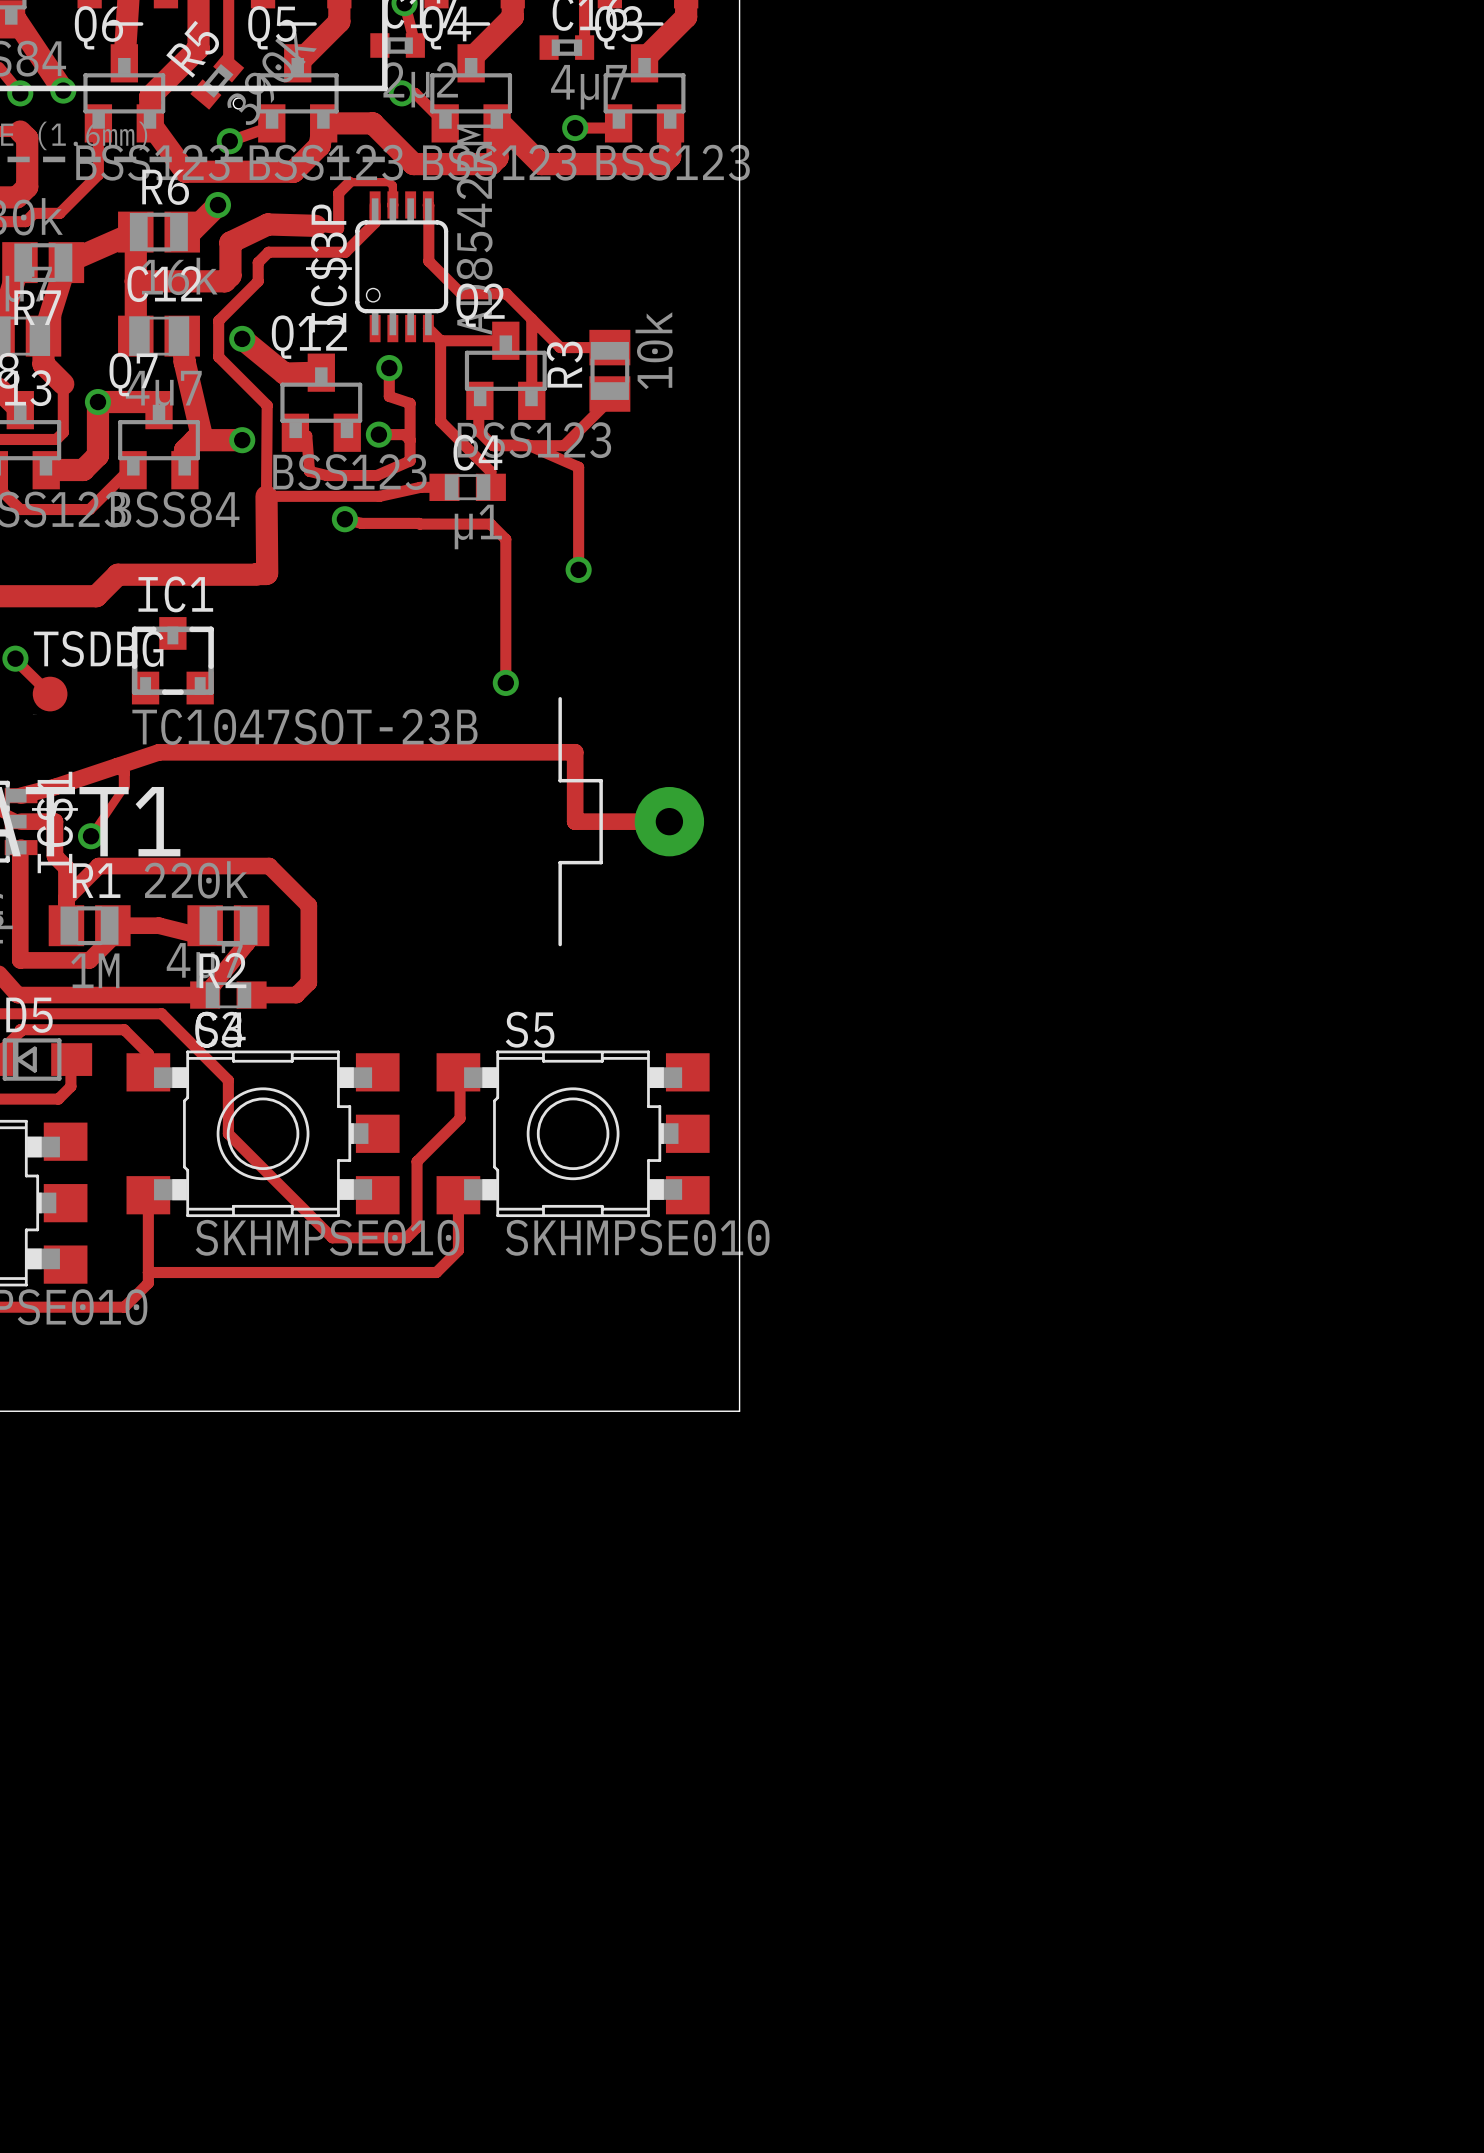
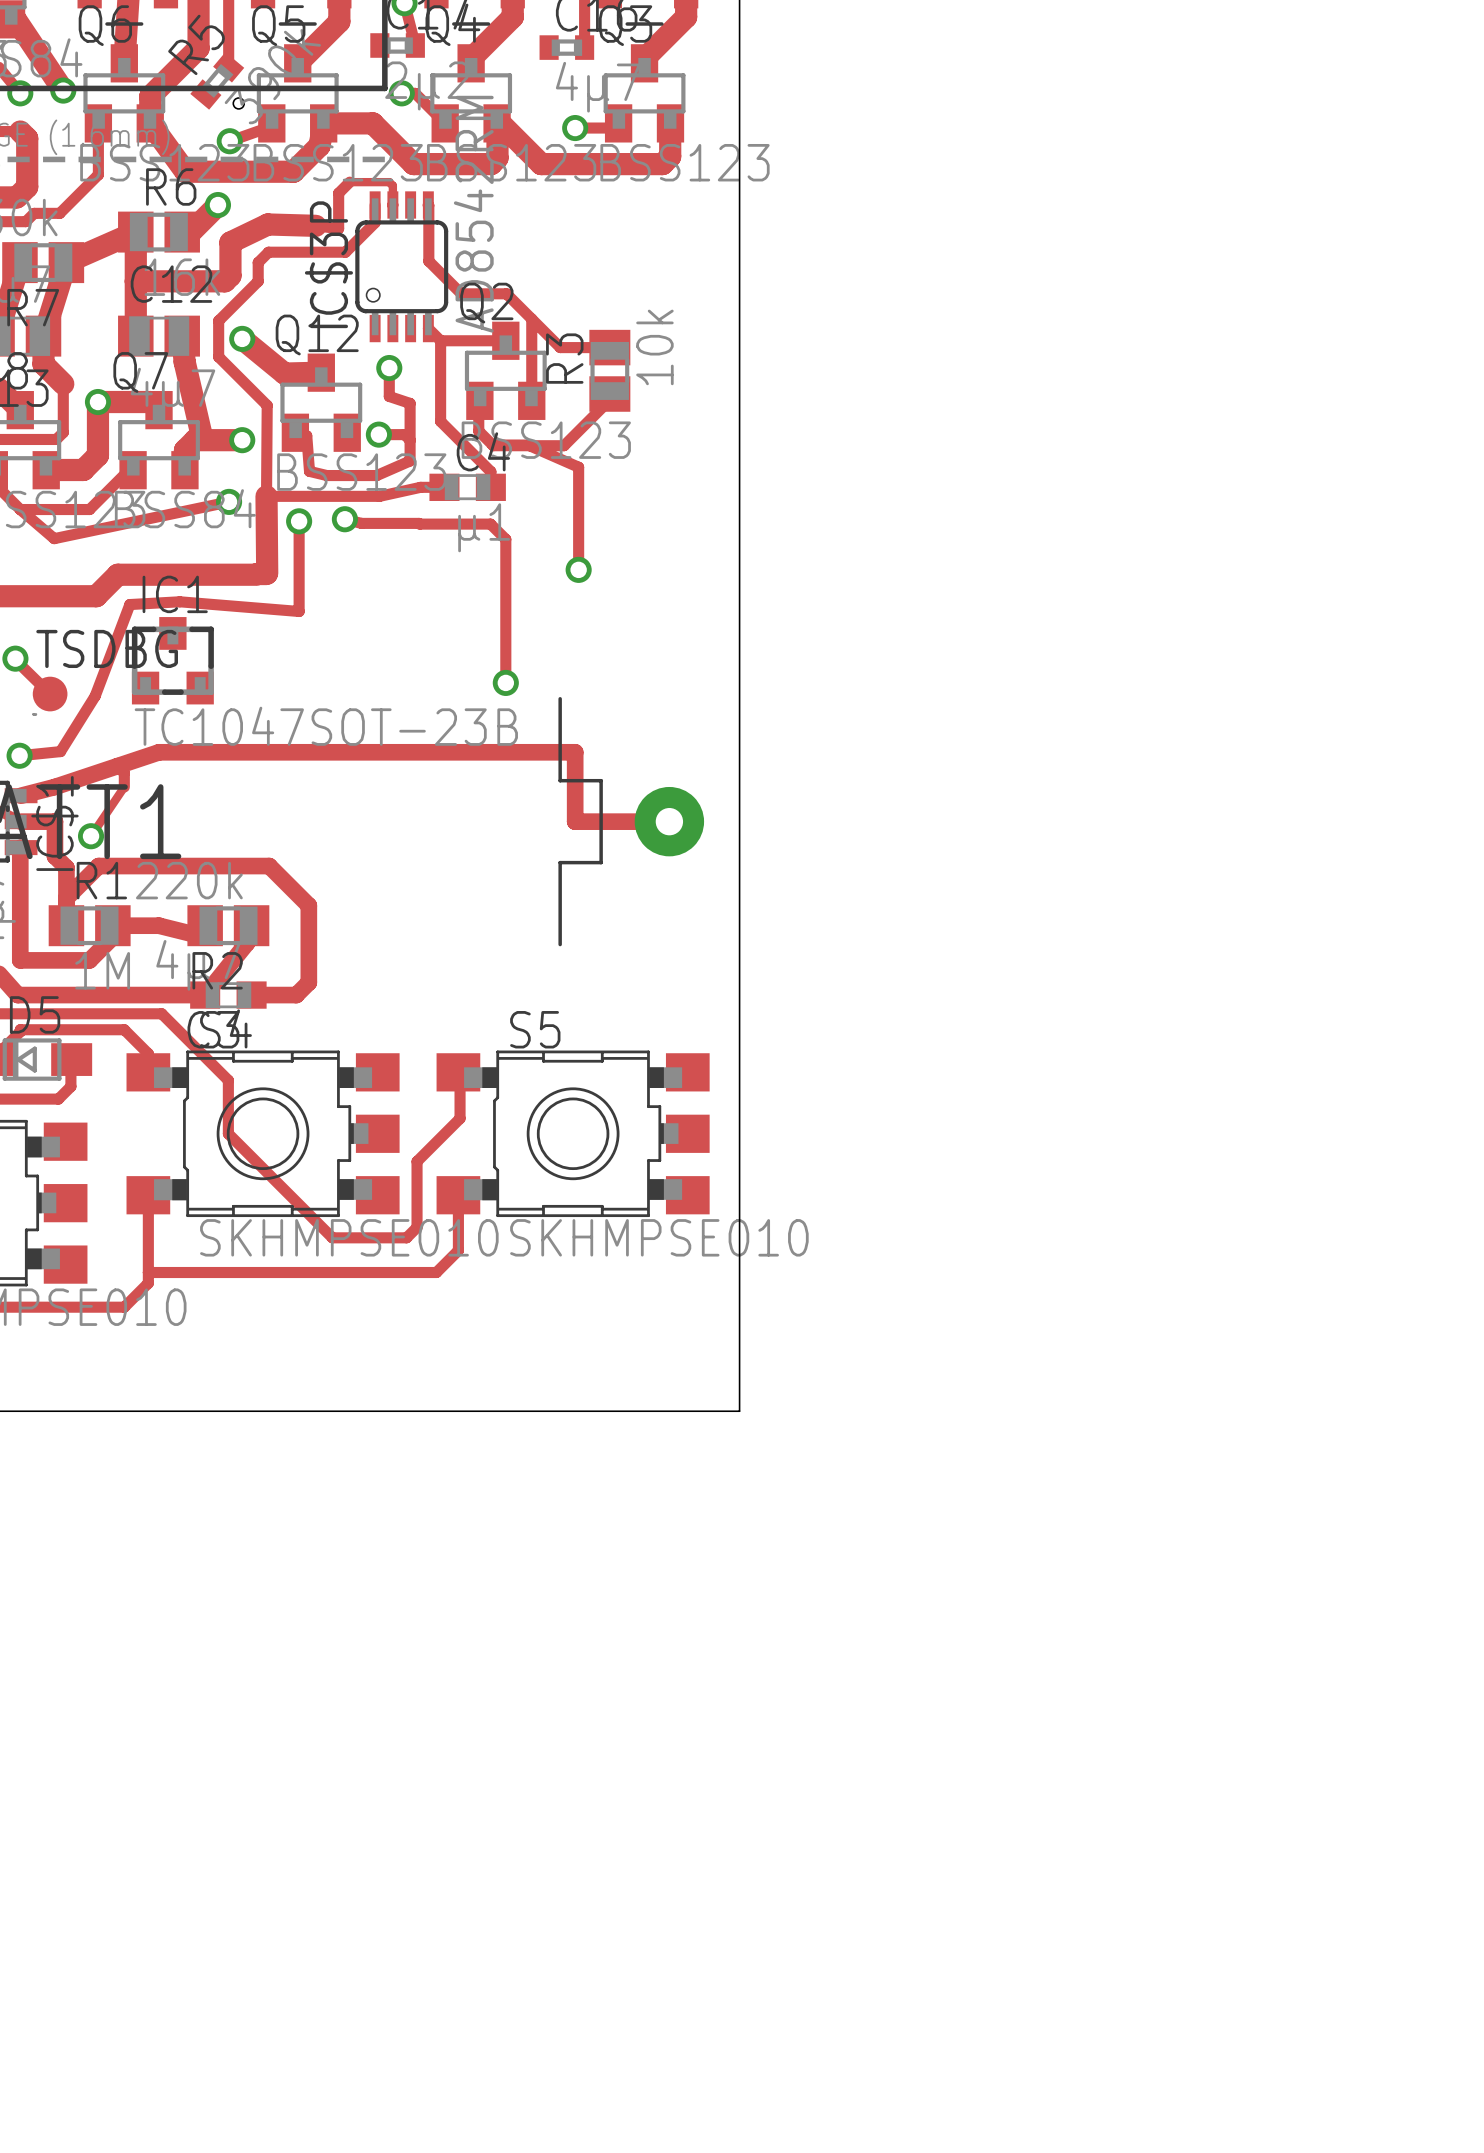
track: none -> (229, 501) (54, 538) (20, 509)
via: none -> (229, 501)
track: none -> (299, 521) (299, 611) (179, 601) (129, 604) (95, 696) (60, 751) (19, 755)
via: none -> (299, 521)
via: none -> (19, 755)

